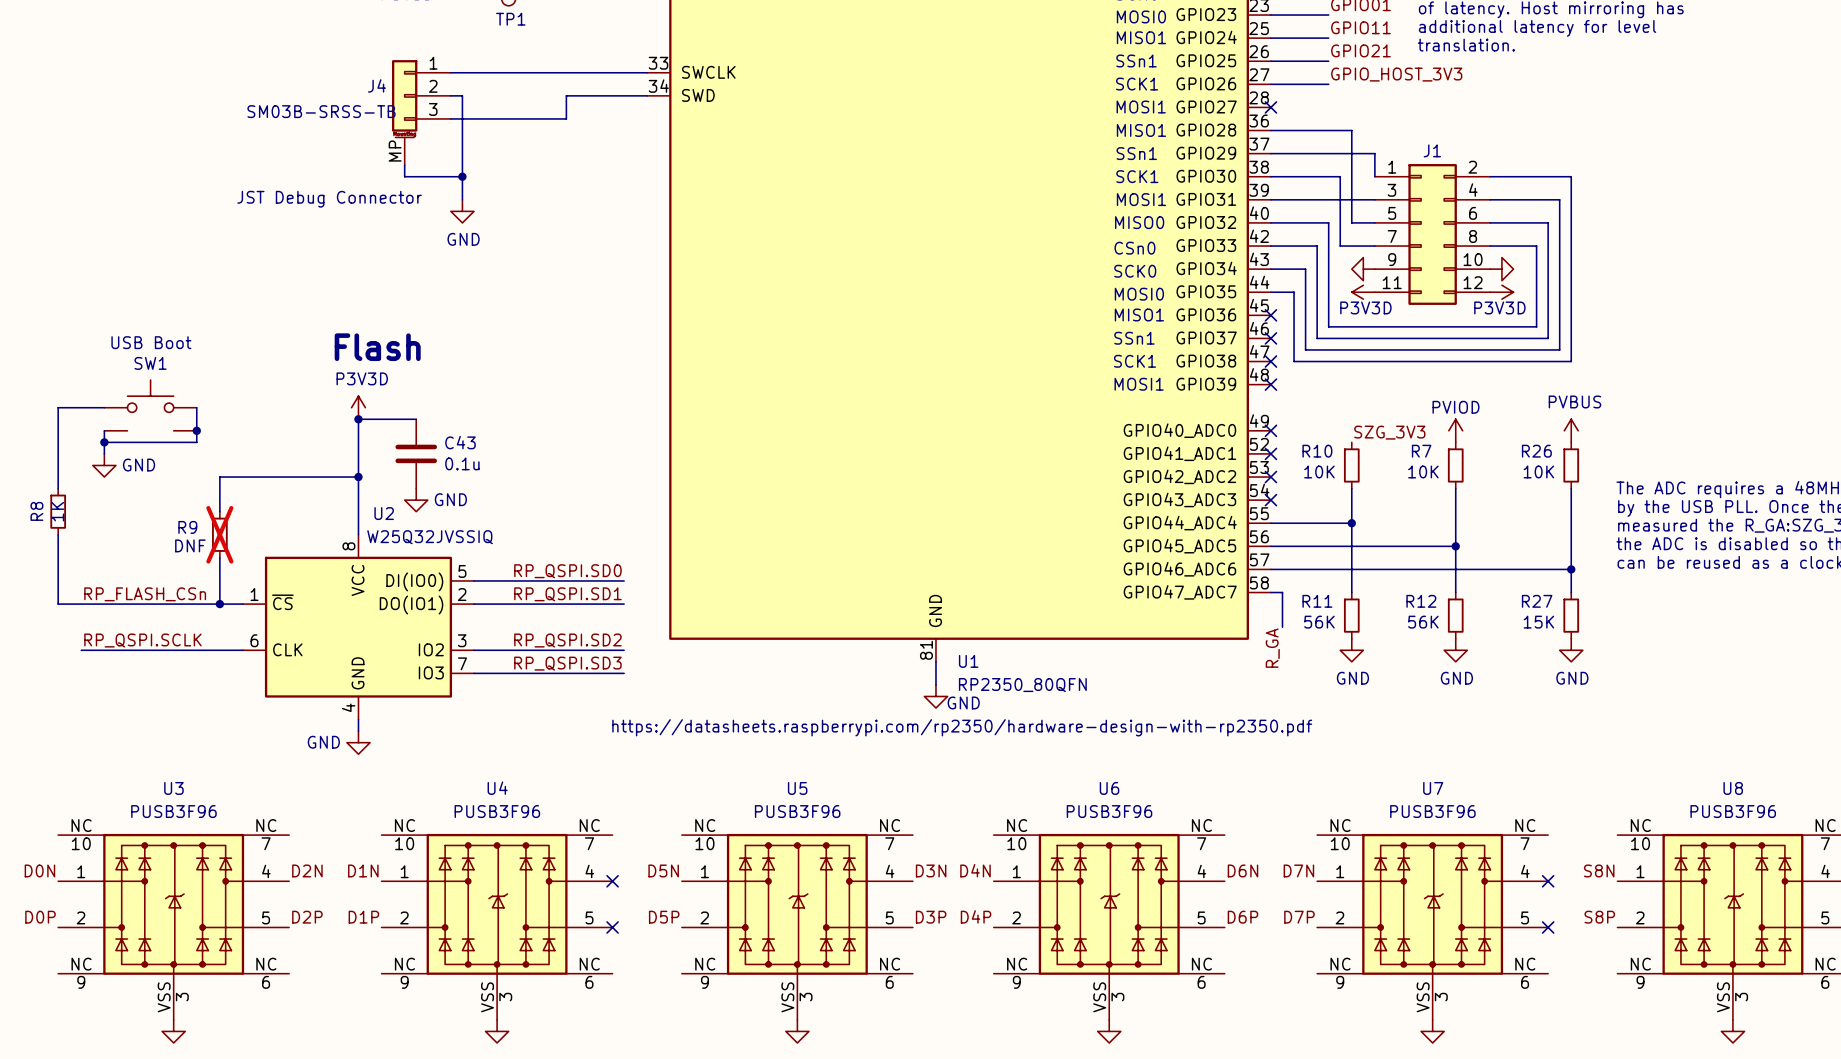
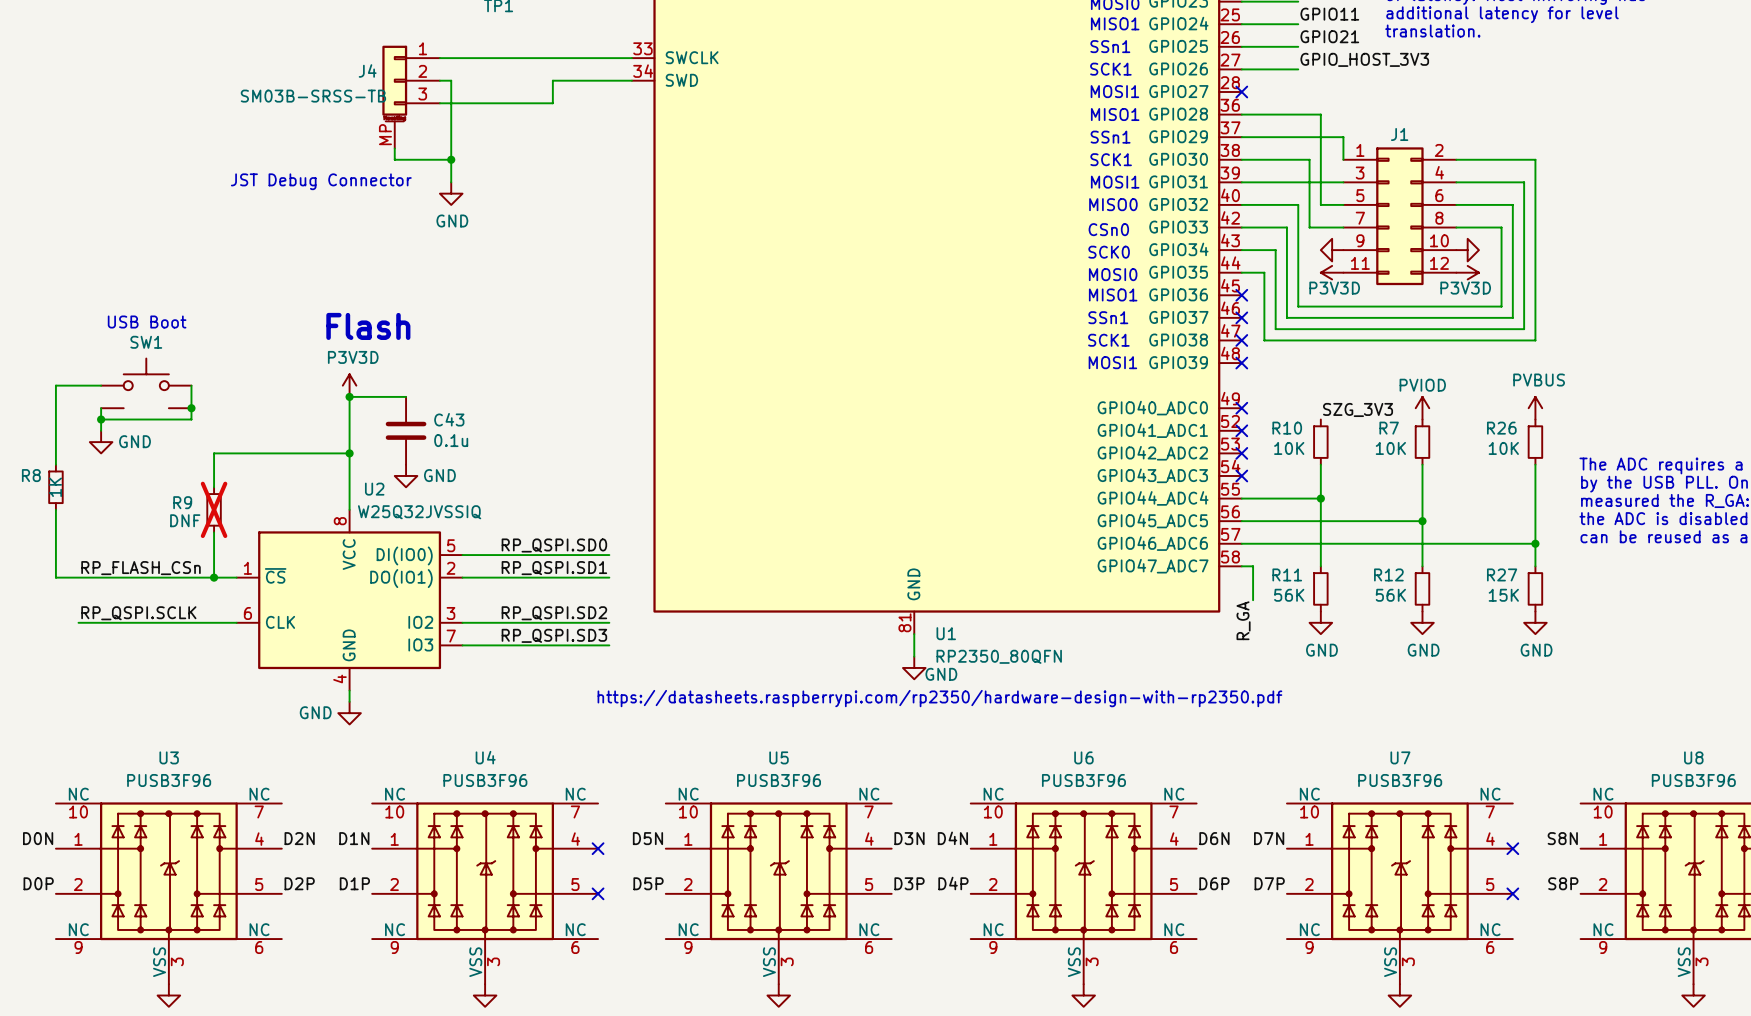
R8 name rotation: 0° (36, 511) -> 90° clockwise (31, 475)

